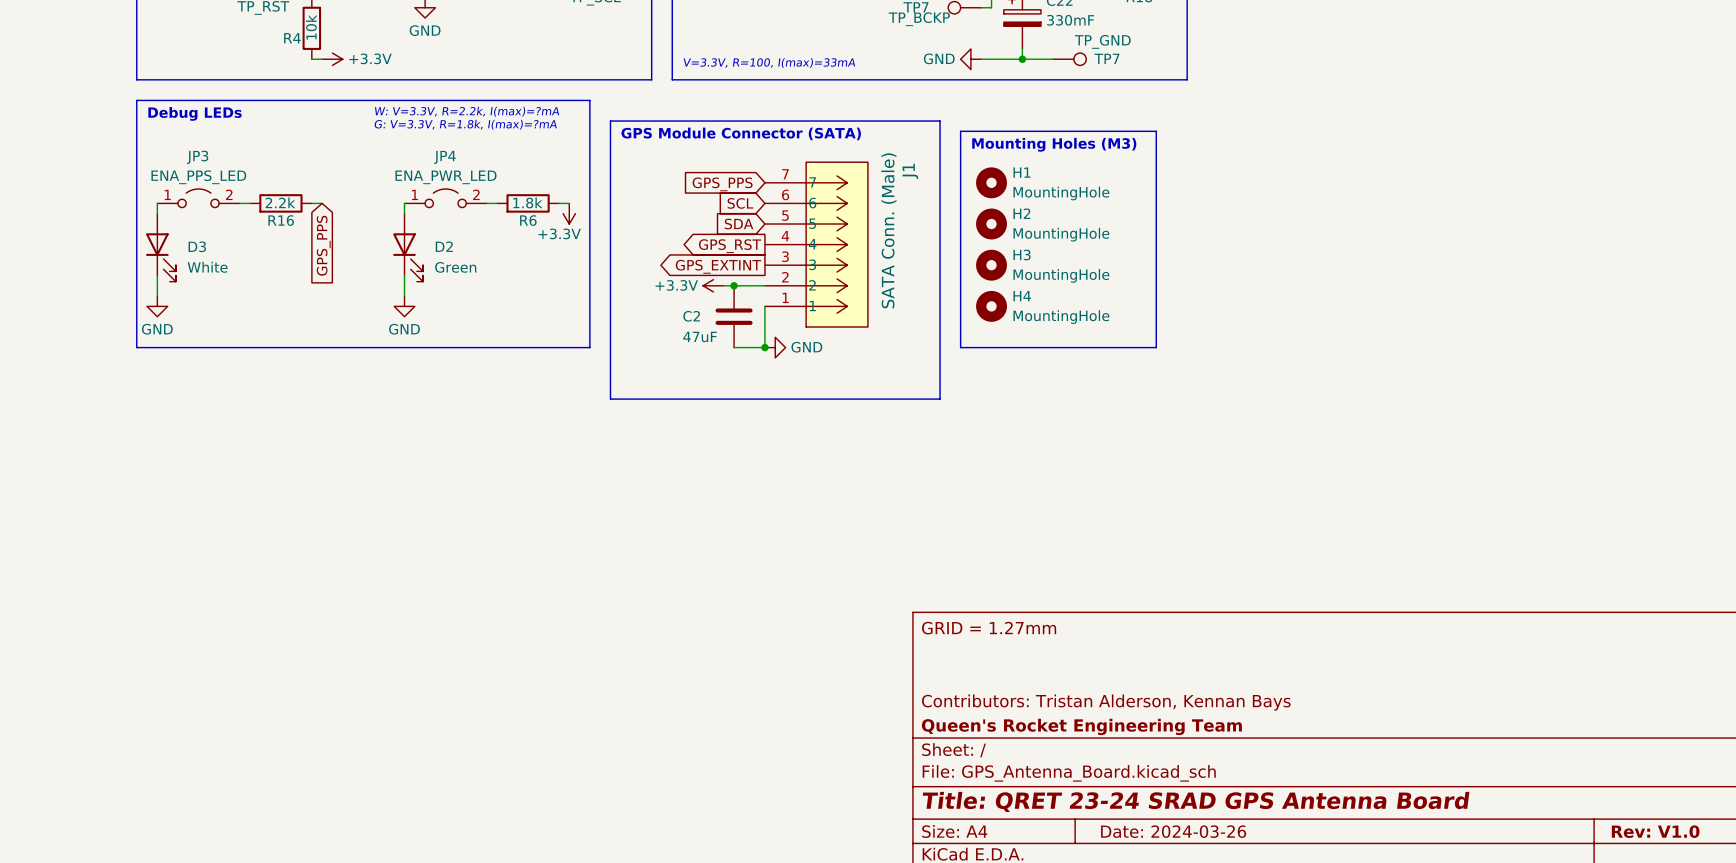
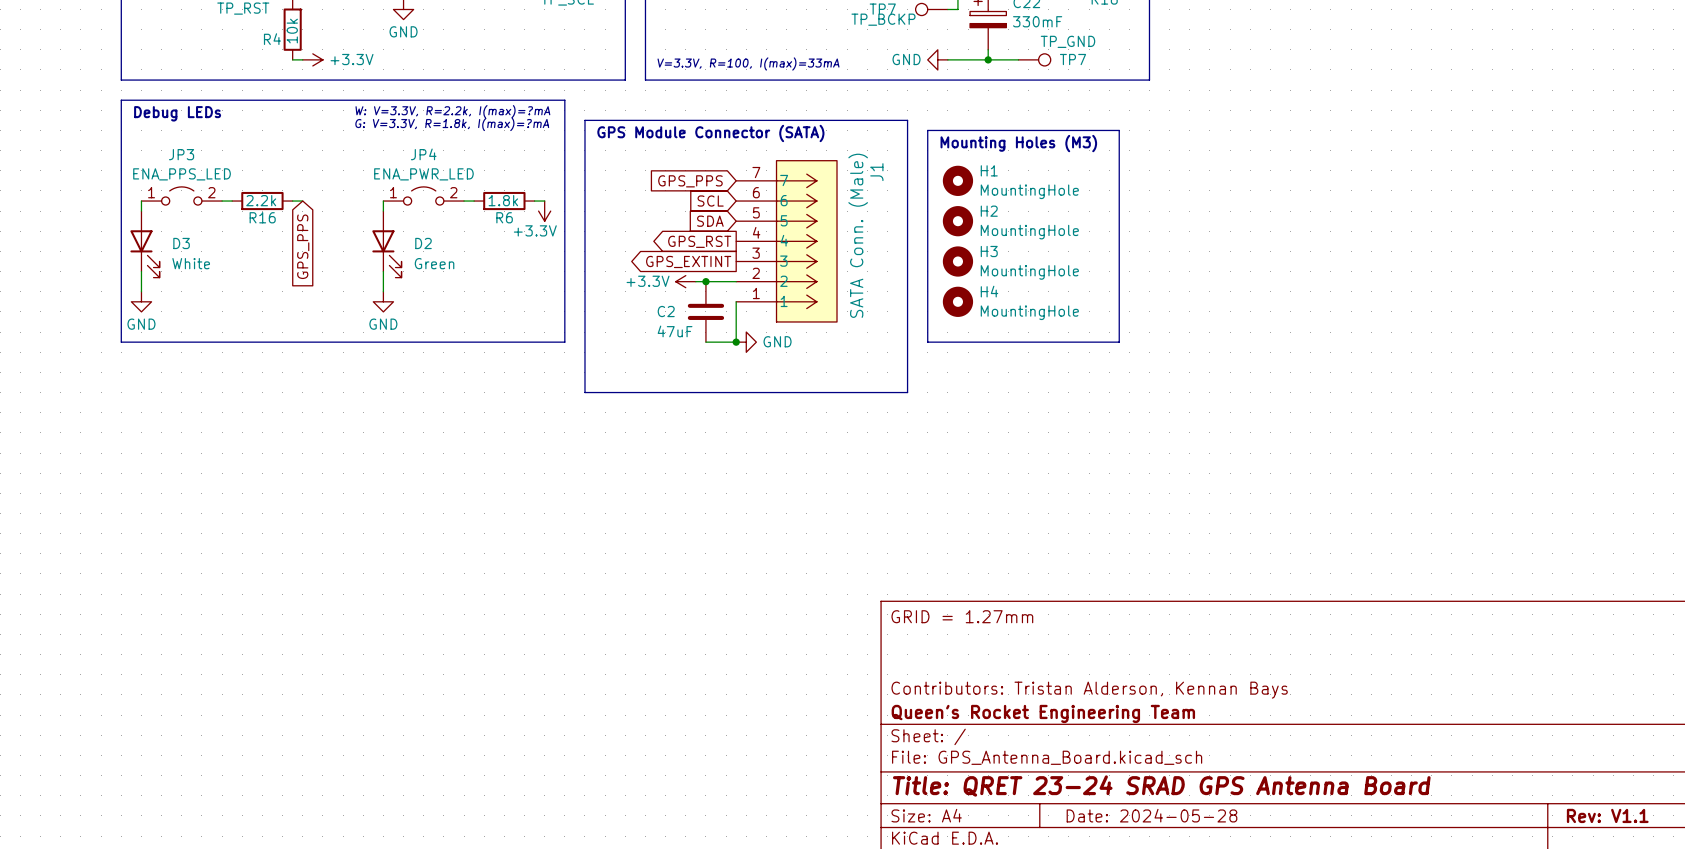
title block: Date: 2024-03-26 (1173, 831) -> Date: 2024-05-28 (1151, 815)
title block: Rev: V1.0 (1655, 831) -> Rev: V1.1 (1607, 815)

